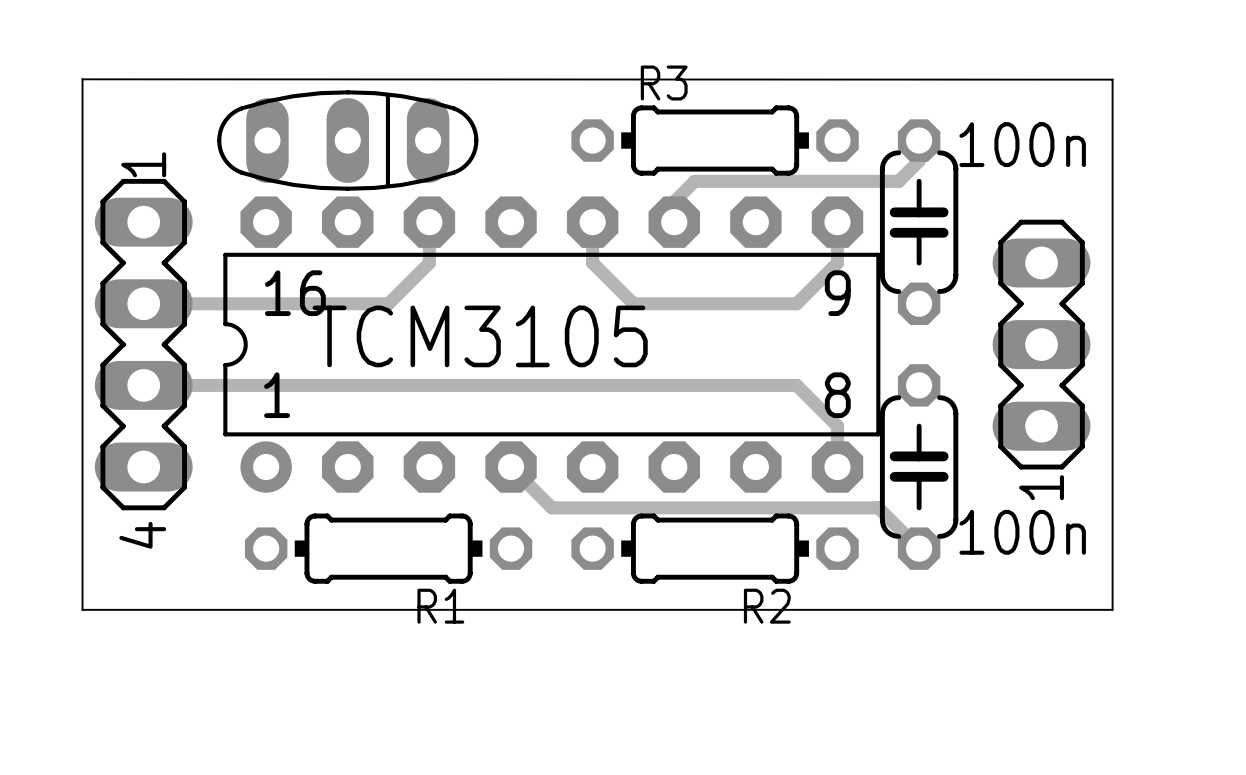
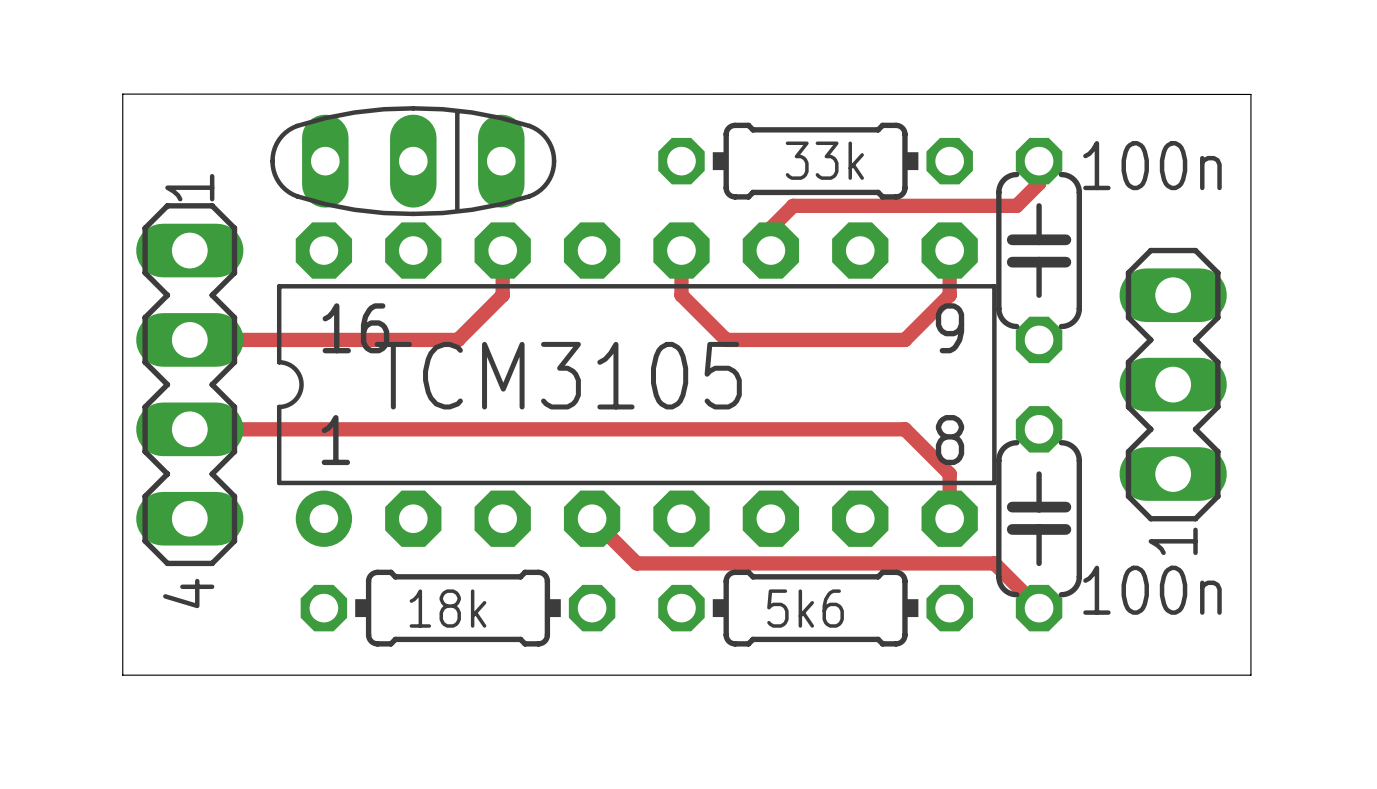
R3 name: R3 (664, 83) -> none
R3 value: none -> 33k (824, 160)
R1 value: none -> 18k (447, 608)
R2 value: none -> 5k6 (805, 608)
R1 name: R1 (440, 606) -> none
R2 name: R2 (767, 606) -> none

